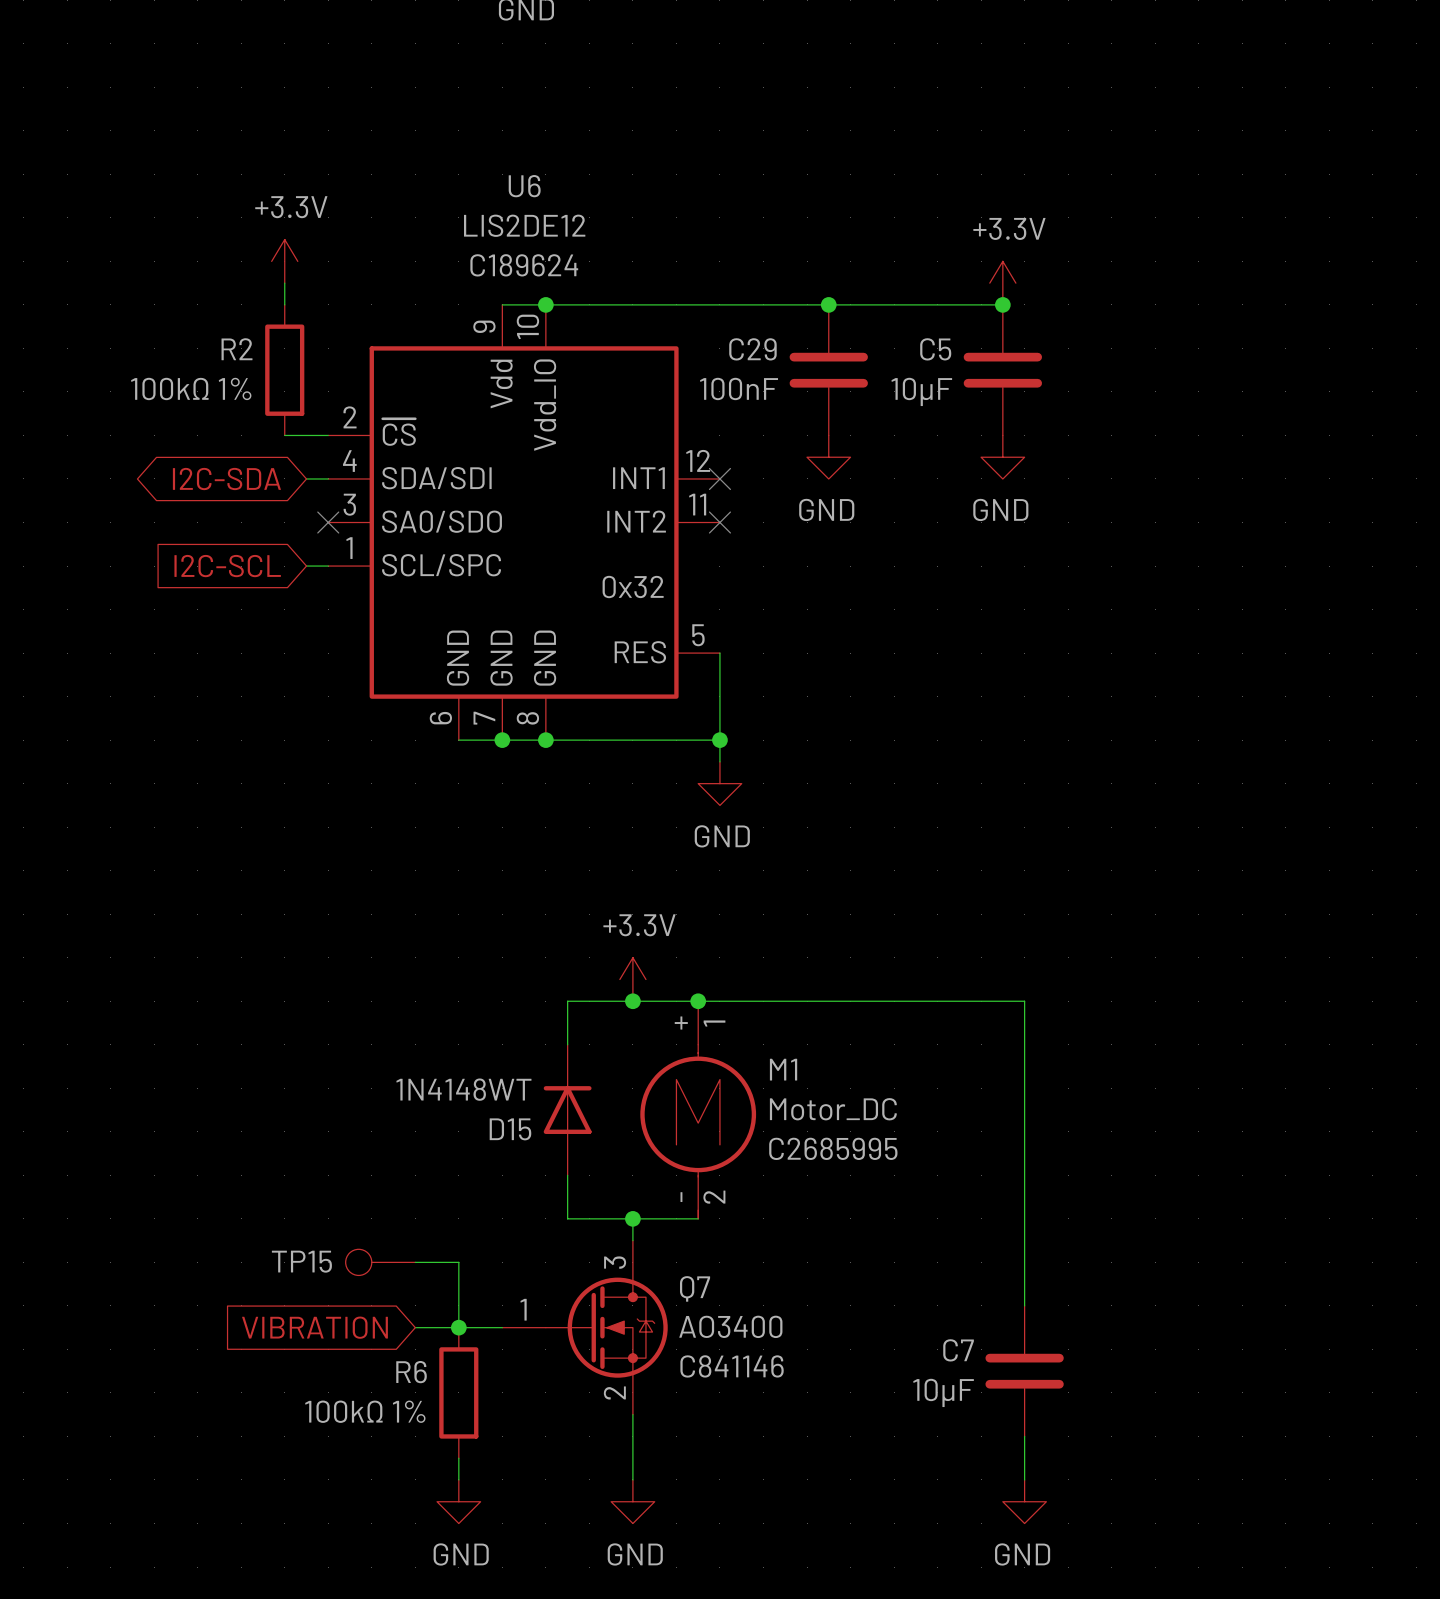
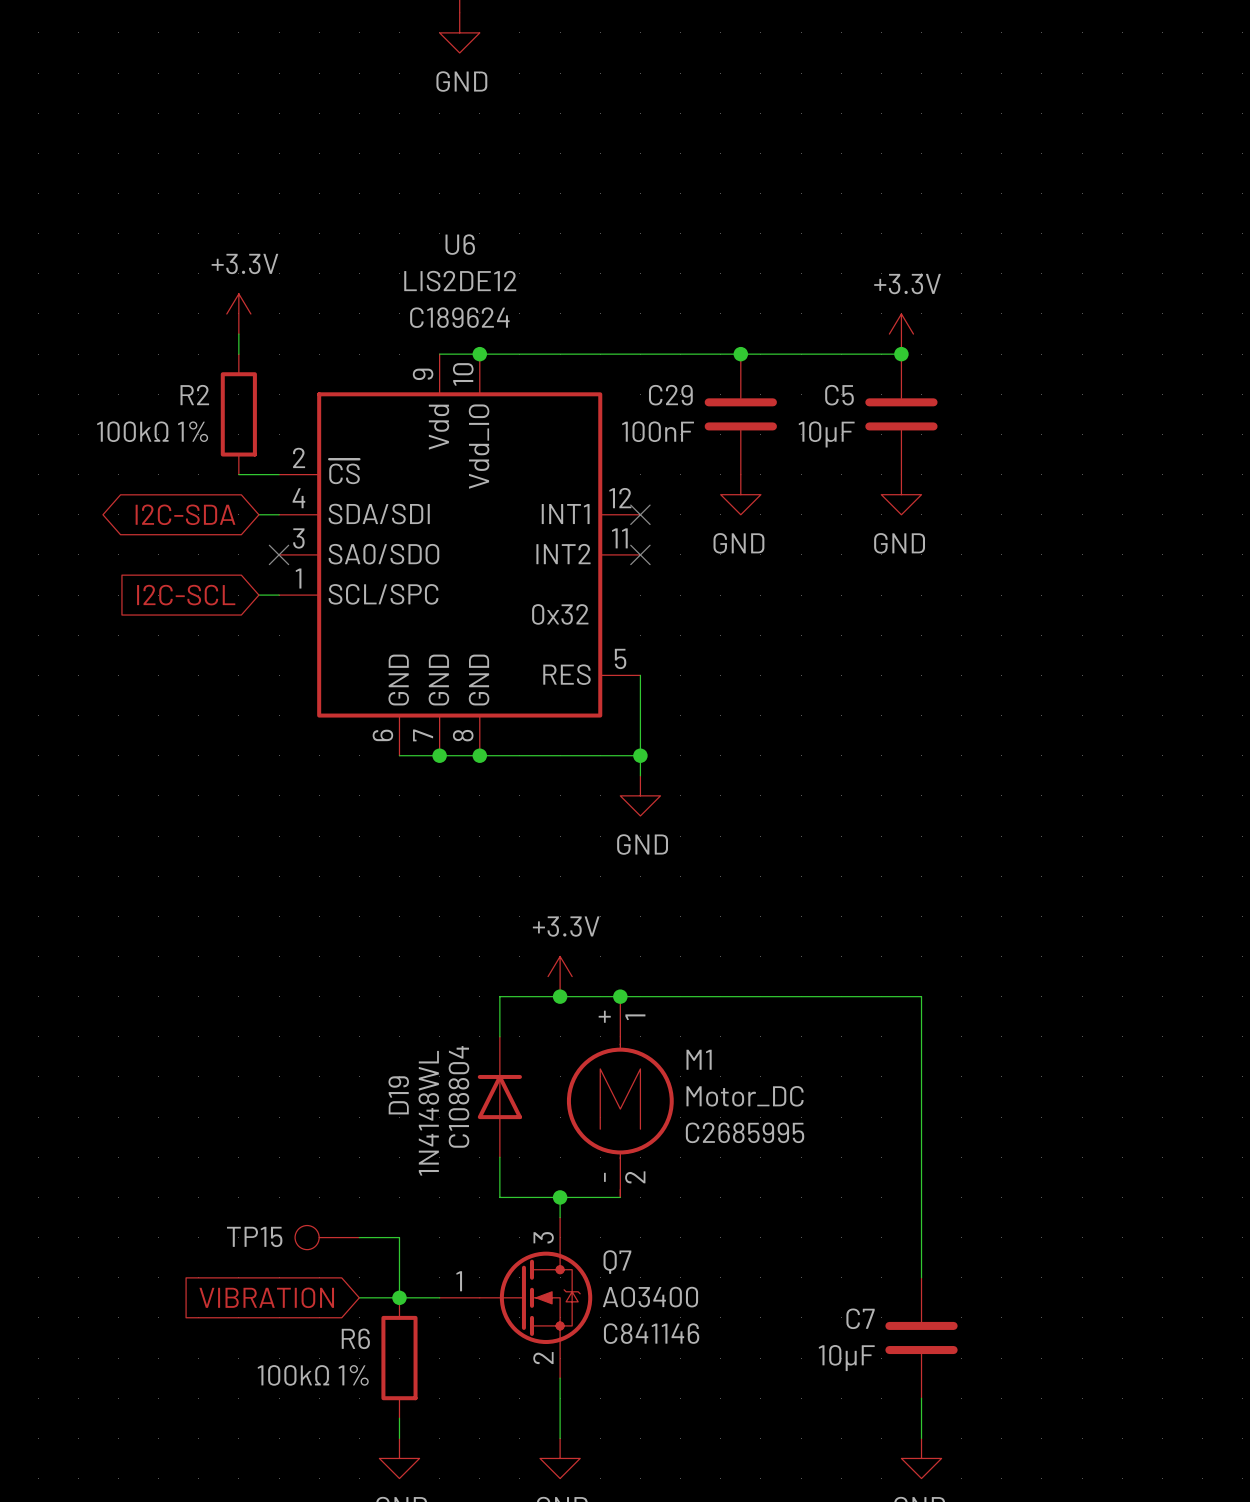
D15 value: 1N4148WT (463, 1089) -> 1N4148WL (428, 1113)
D15 text: none -> C108804 (458, 1096)
D15 name: D15 (510, 1129) -> D19 (398, 1095)

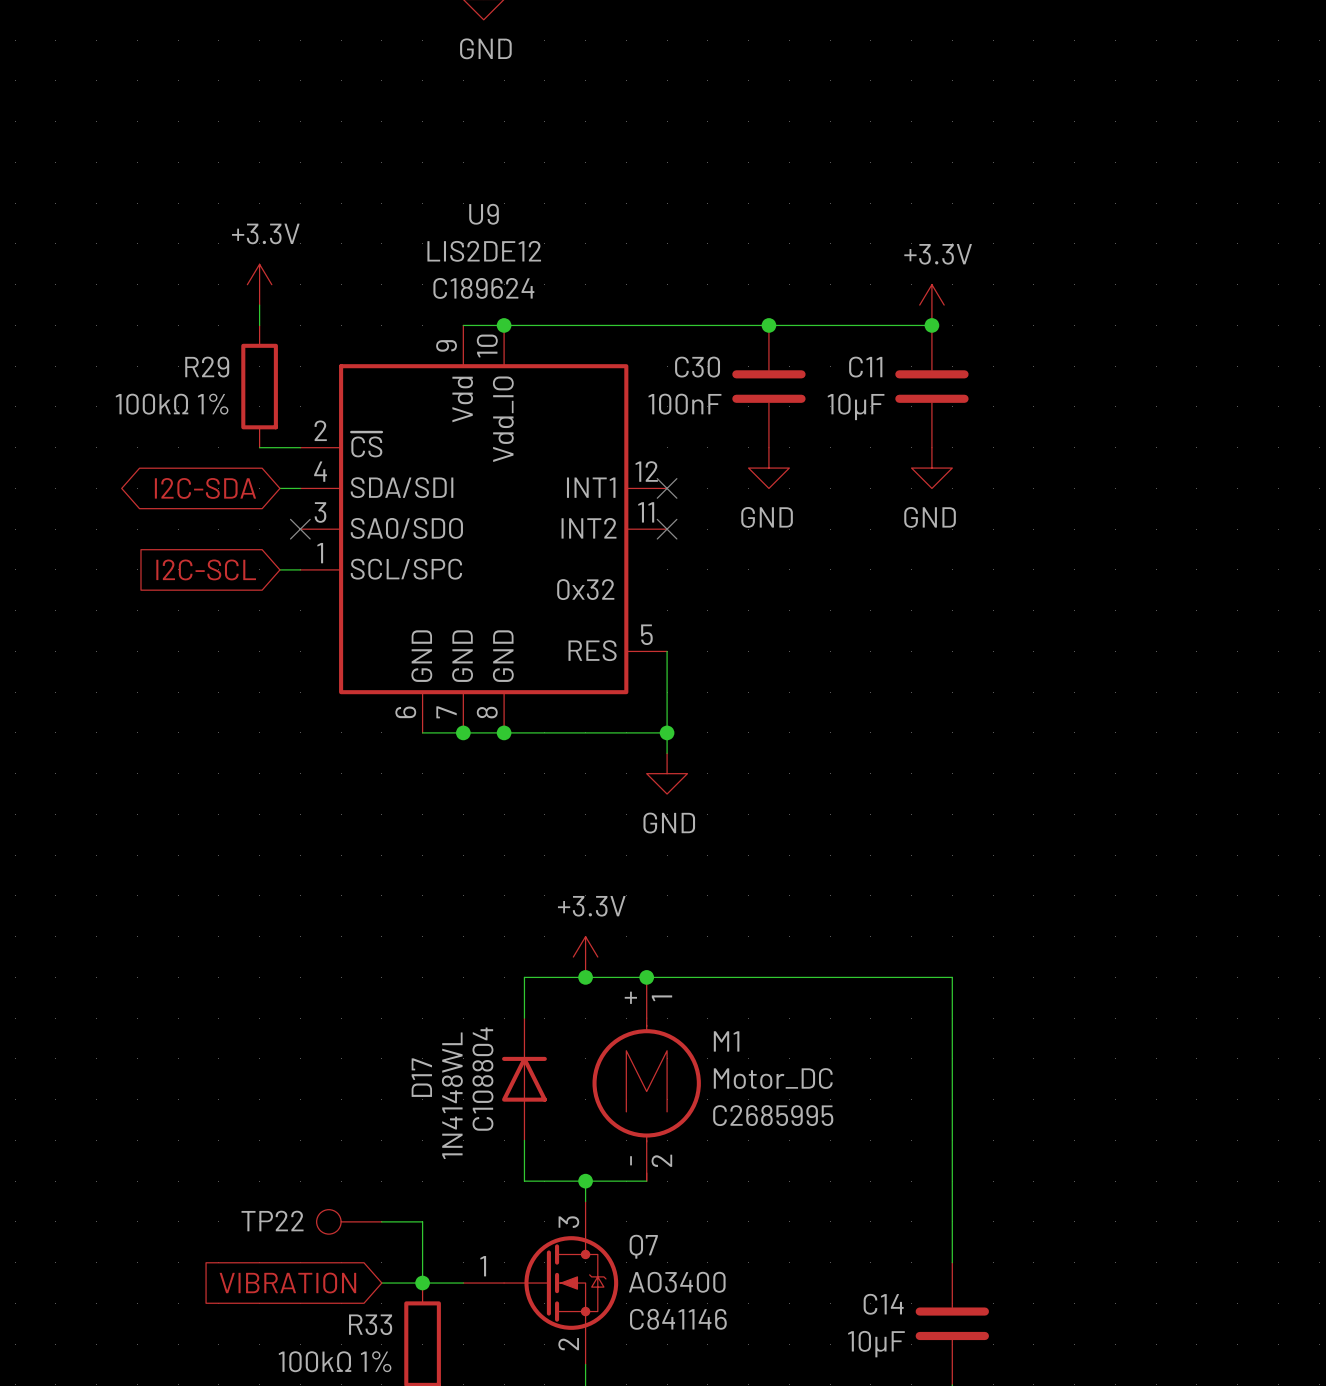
U6 name: U6 (460, 244) -> U9 (484, 214)
R2 name: R2 (194, 395) -> R29 (207, 367)
C29 name: C29 (670, 395) -> C30 (697, 367)
C5 name: C5 (839, 395) -> C11 (865, 367)
D19 name: D19 (398, 1095) -> D17 (421, 1077)
TP15 name: TP15 (254, 1236) -> TP22 (272, 1221)
C7 name: C7 (860, 1318) -> C14 (883, 1304)
R6 name: R6 (355, 1338) -> R33 (370, 1324)

